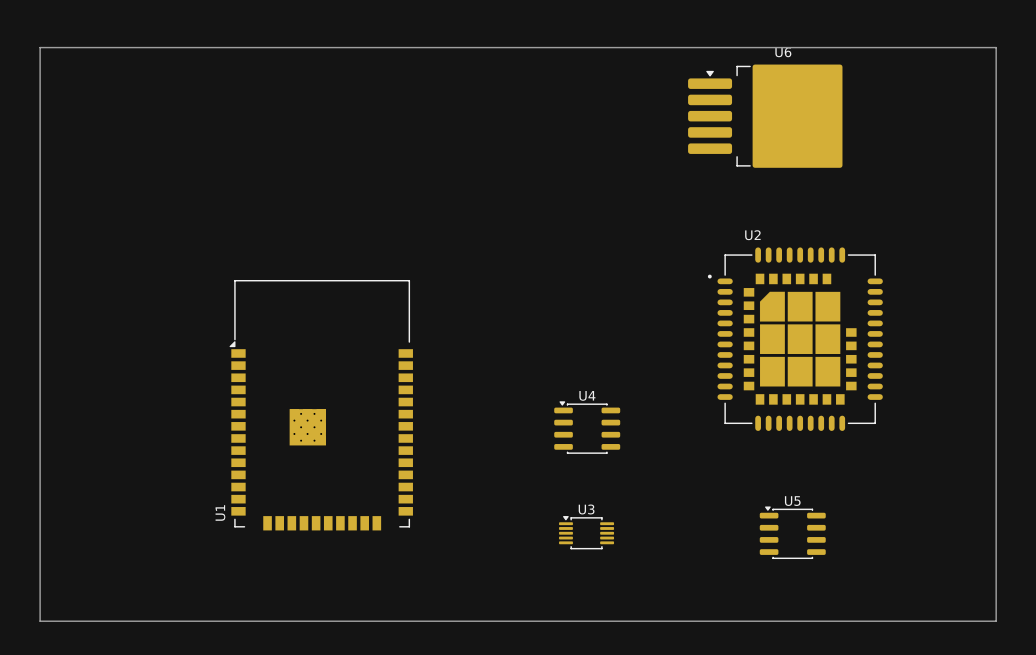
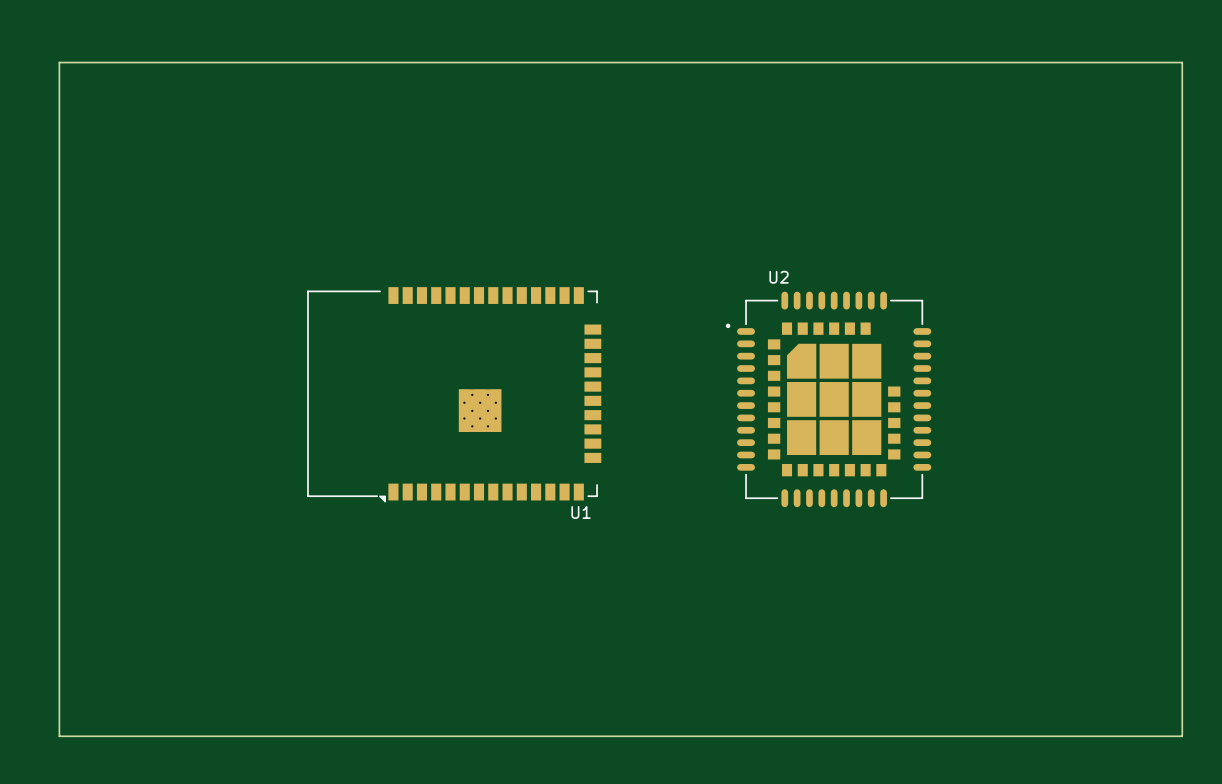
U6: (765, 116) -> none
U2 position: (795, 339) -> (828, 399)
U1 rotation: 0° (321, 405) -> 90° counterclockwise (454, 394)
U4: (587, 427) -> none
U3: (586, 532) -> none
U5: (792, 532) -> none

